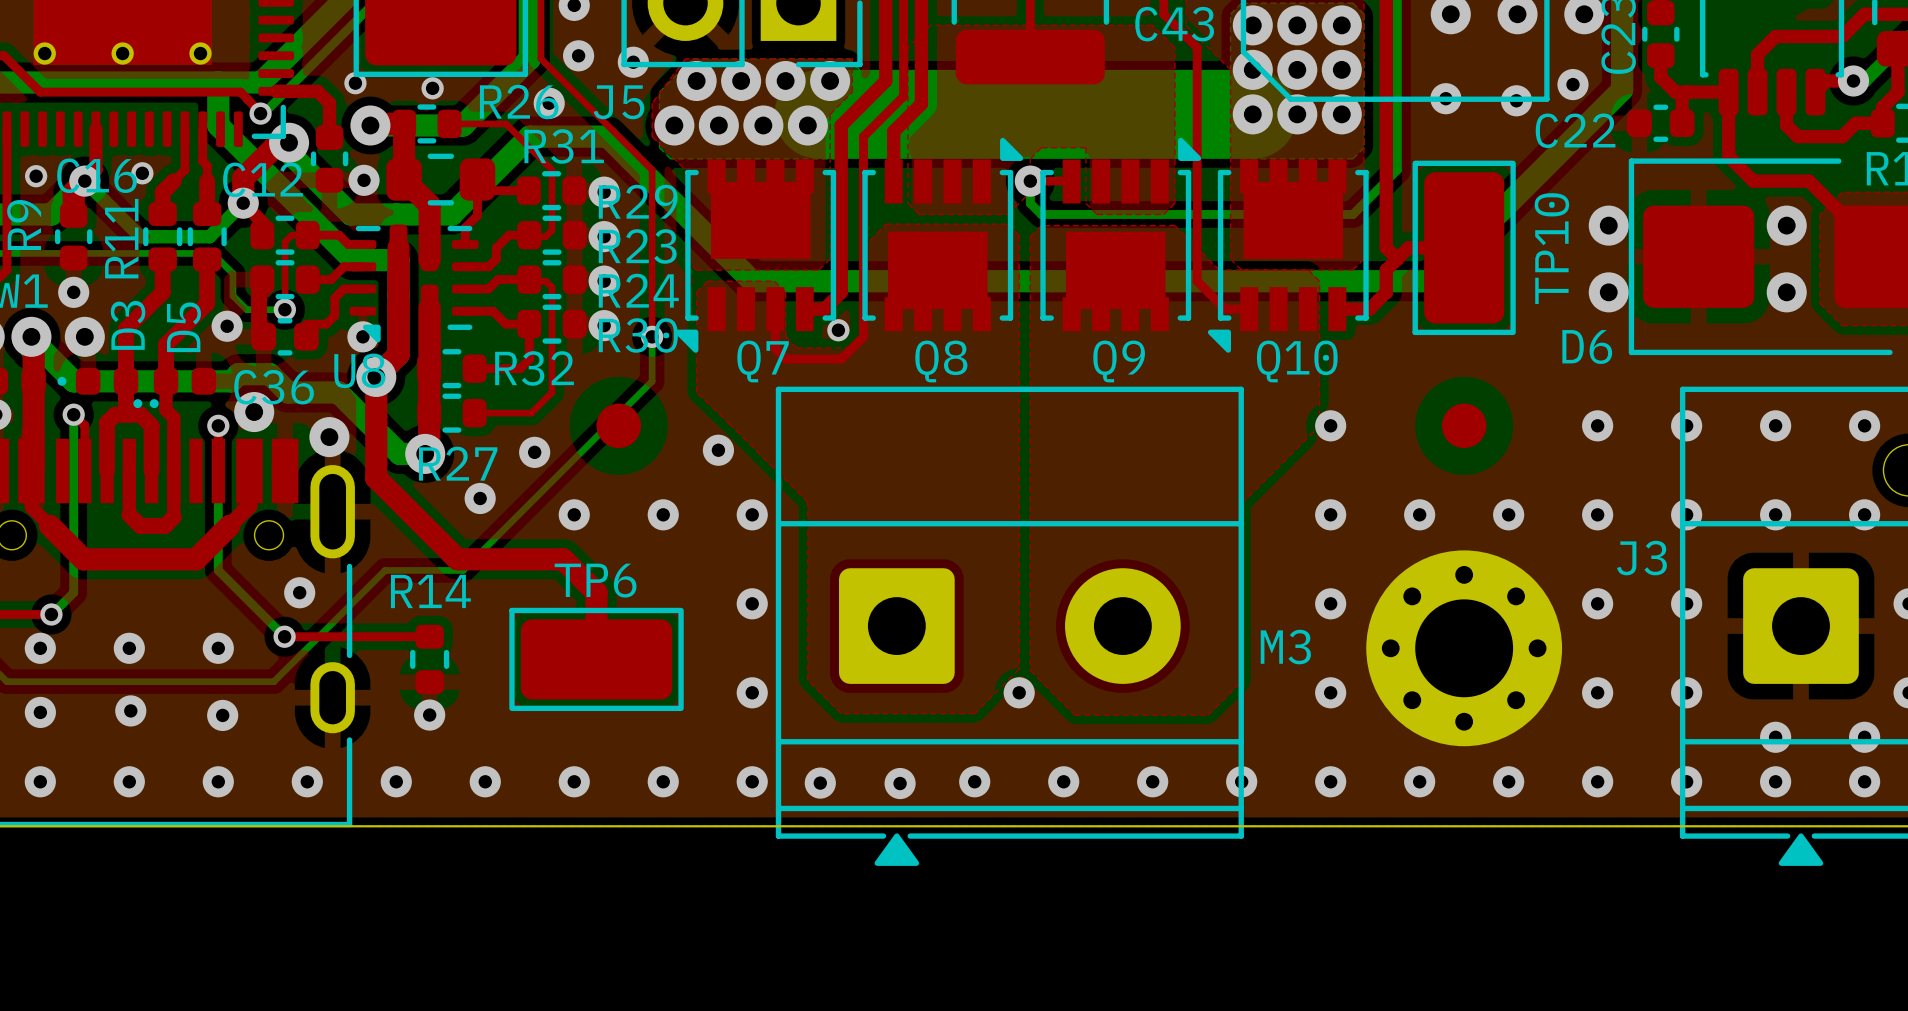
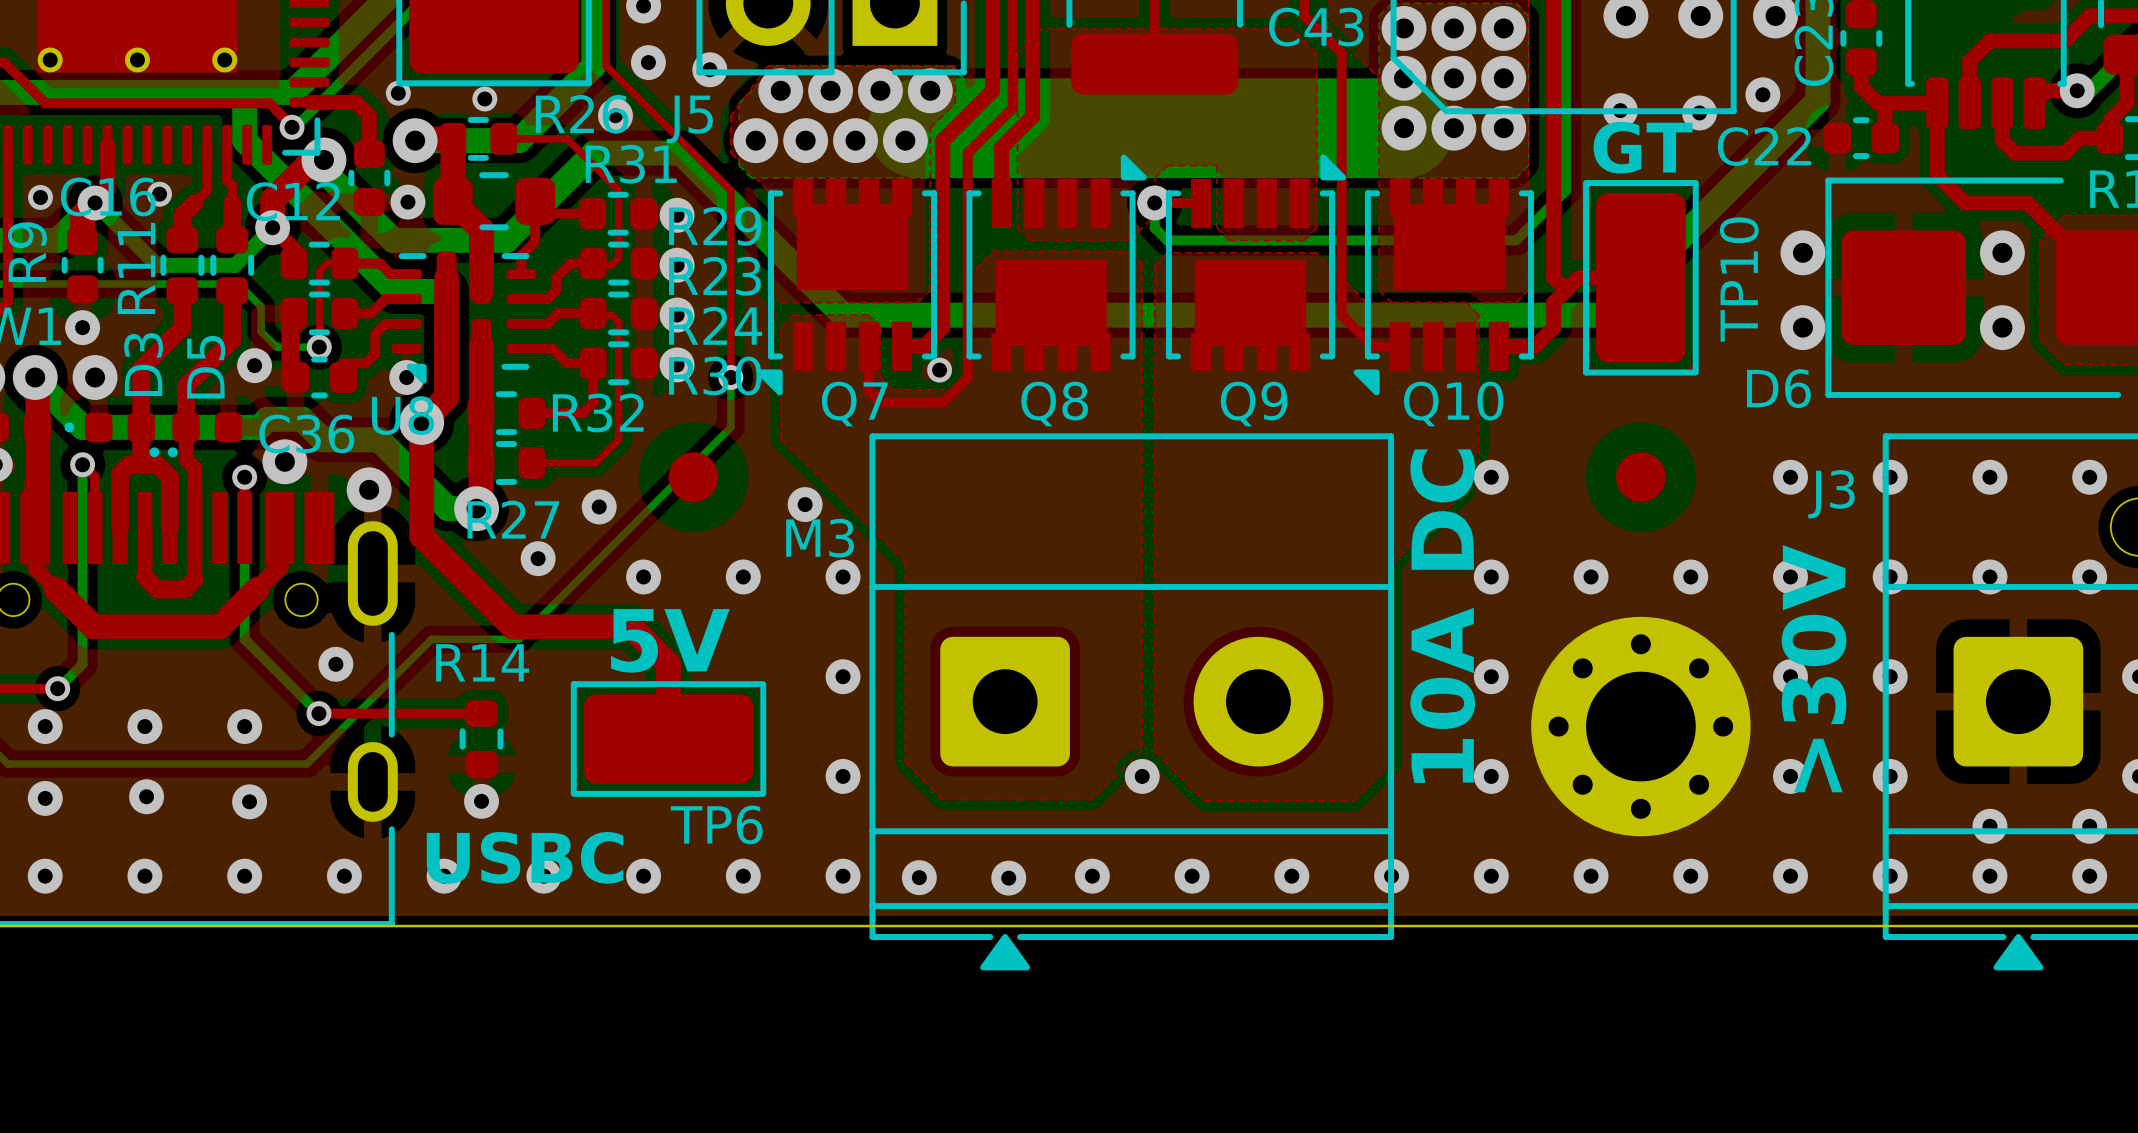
text: none -> GT (1643, 147)
J3 name position: J3 (1641, 558) -> J3 (1831, 494)
text: none -> 10A DC (1442, 616)
text: none -> 5V (670, 640)
TP6 name position: TP6 (595, 580) -> TP6 (716, 824)
text: none -> >30V (1814, 668)
M3 name position: M3 (1285, 647) -> M3 (820, 538)
text: none -> USBC (525, 857)

